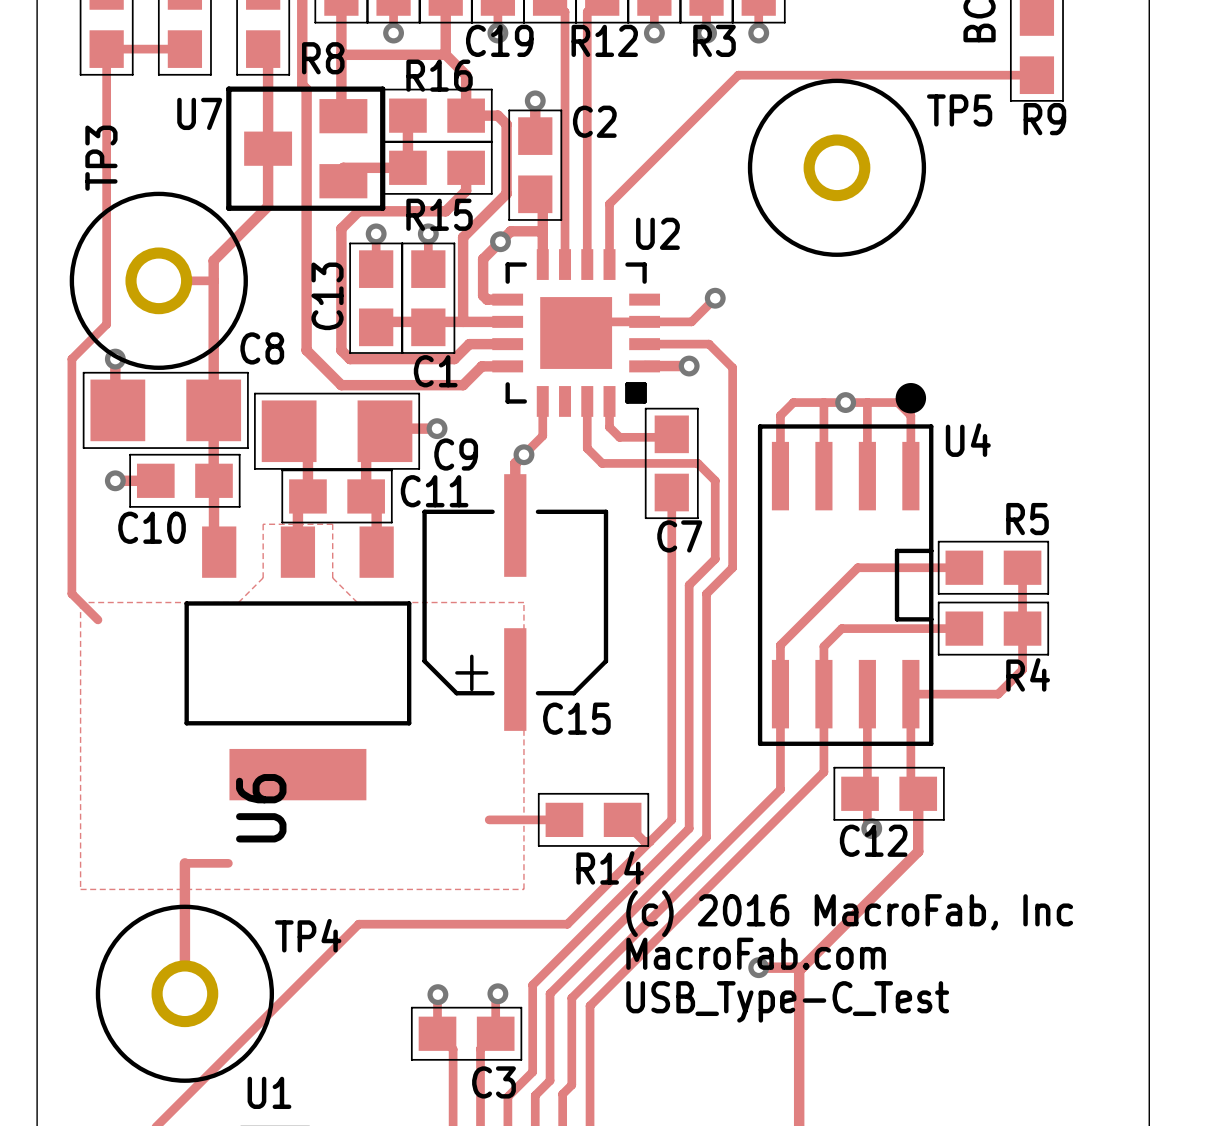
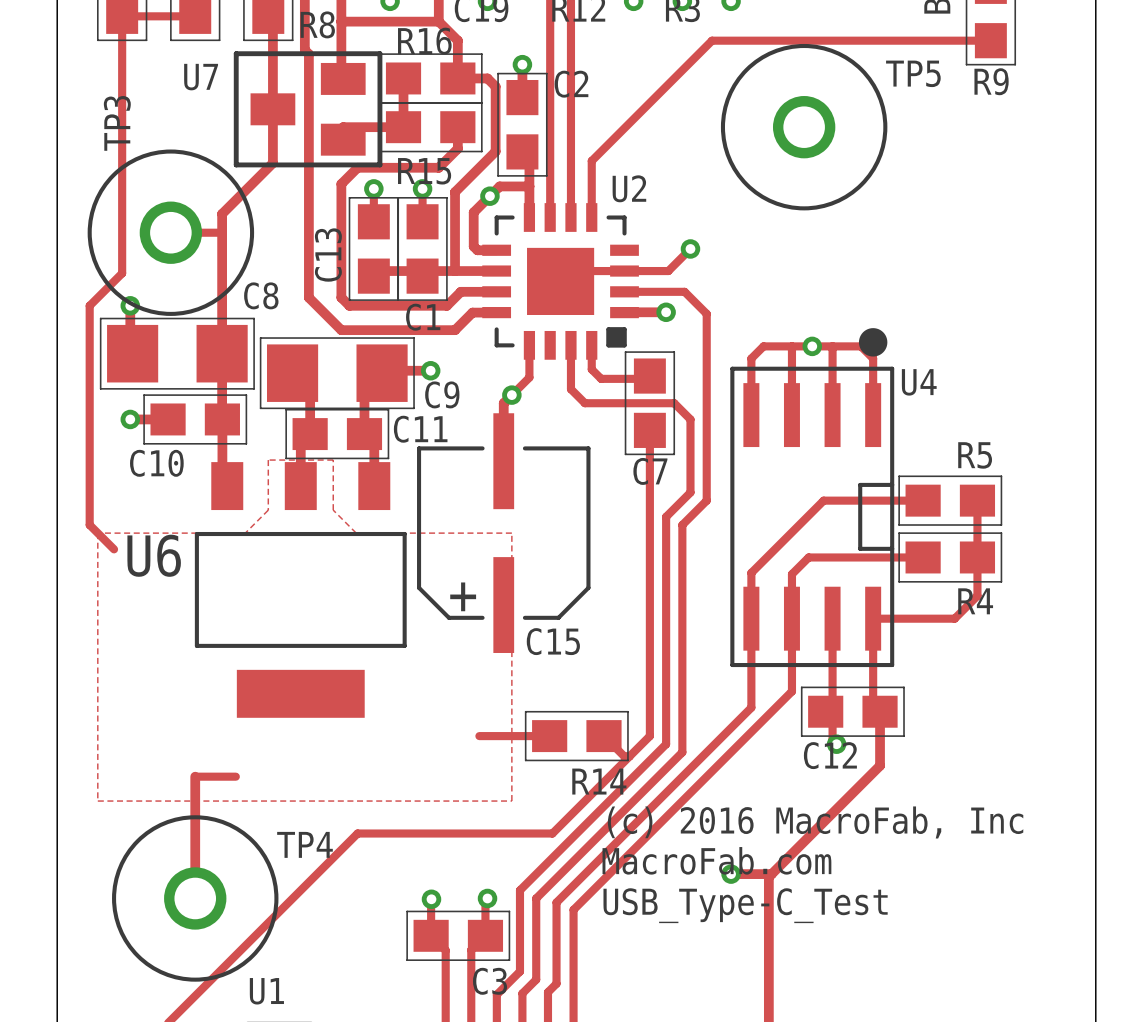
U6 name rotation: 0° (261, 808) -> 90° clockwise (154, 555)
U6 name position: U6 (261, 808) -> U6 (154, 555)

